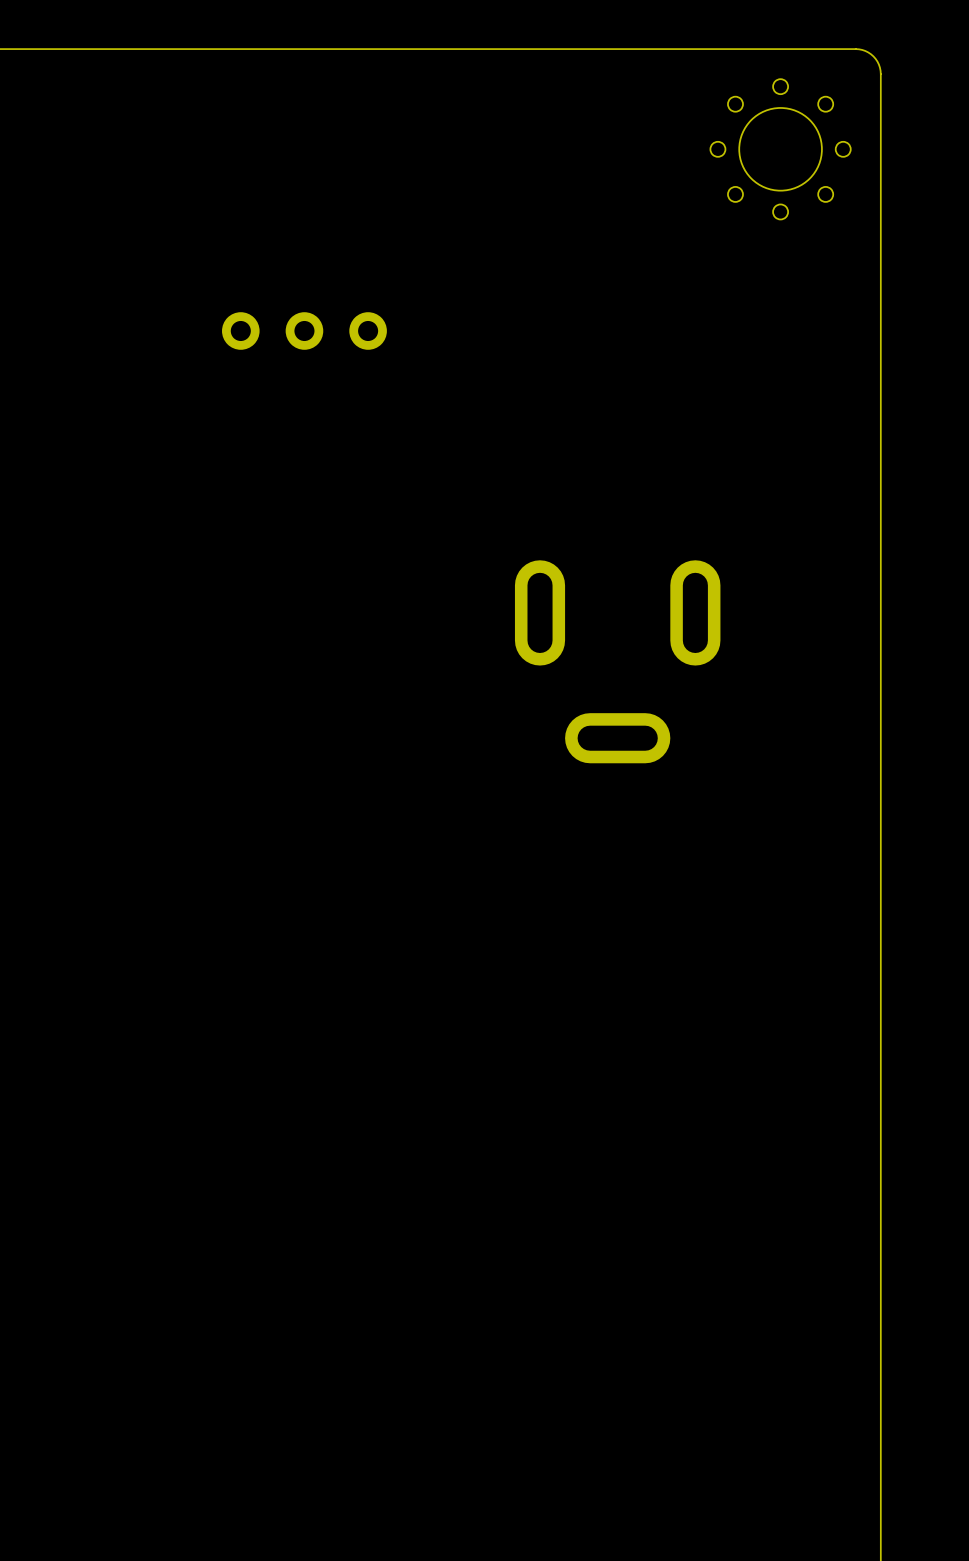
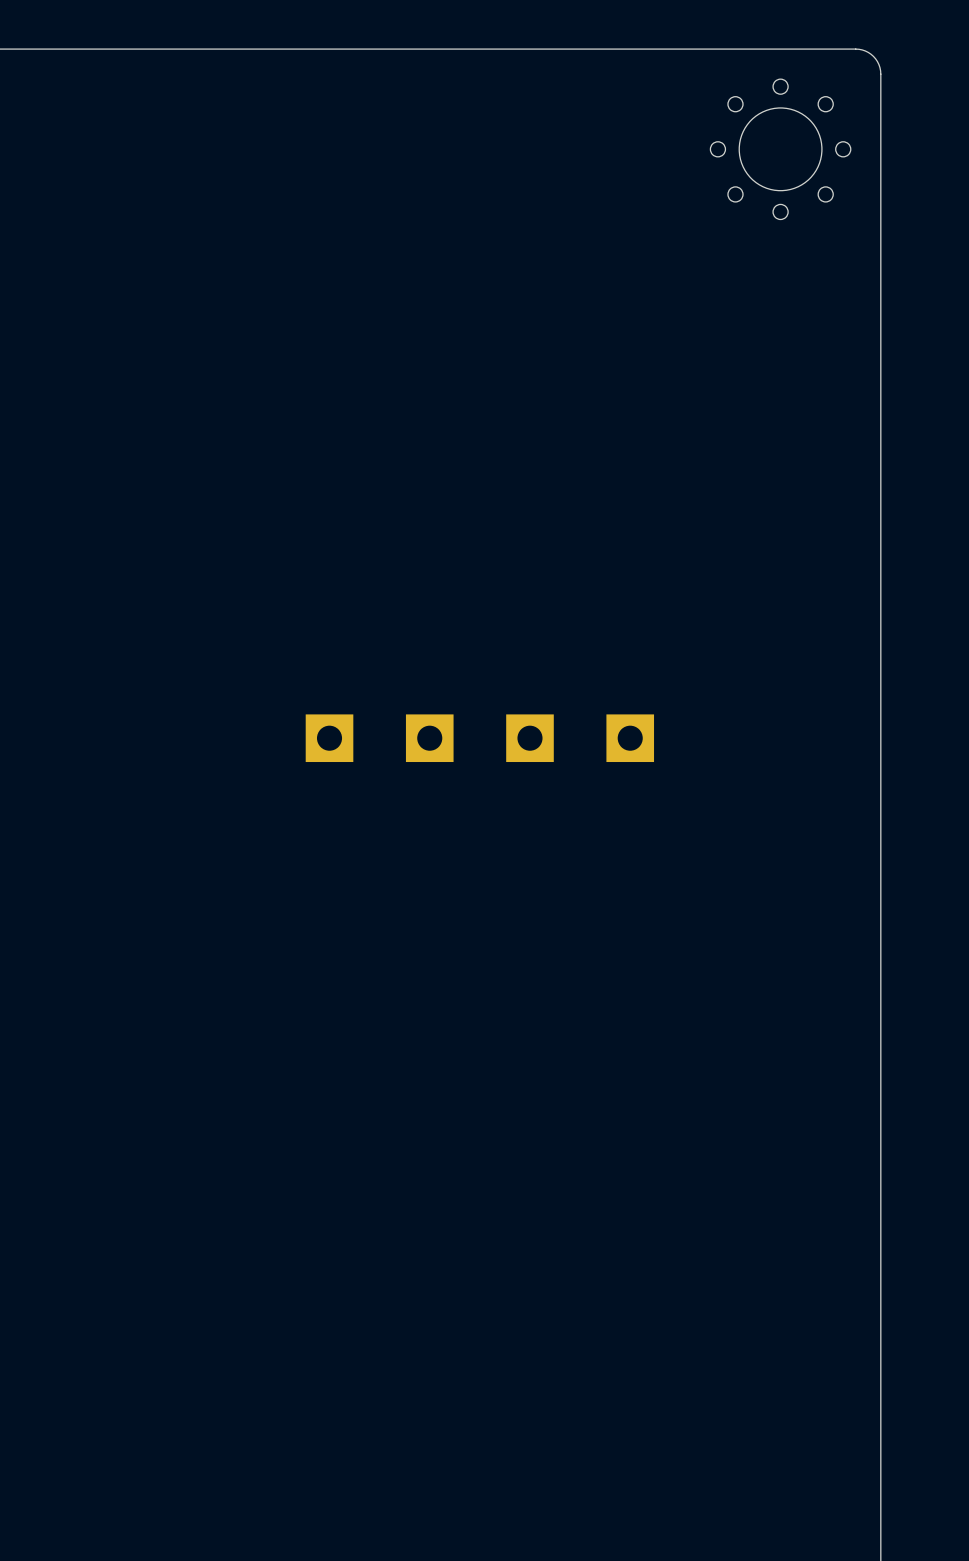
part: (304, 331) -> none
part: (617, 661) -> none
part: none -> (329, 738)
part: none -> (429, 738)
part: none -> (529, 738)
part: none -> (630, 738)

